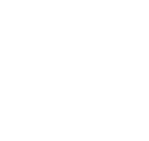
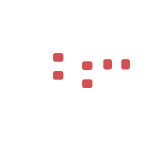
part: none -> (116, 64)
part: none -> (58, 66)
part: none -> (87, 74)

